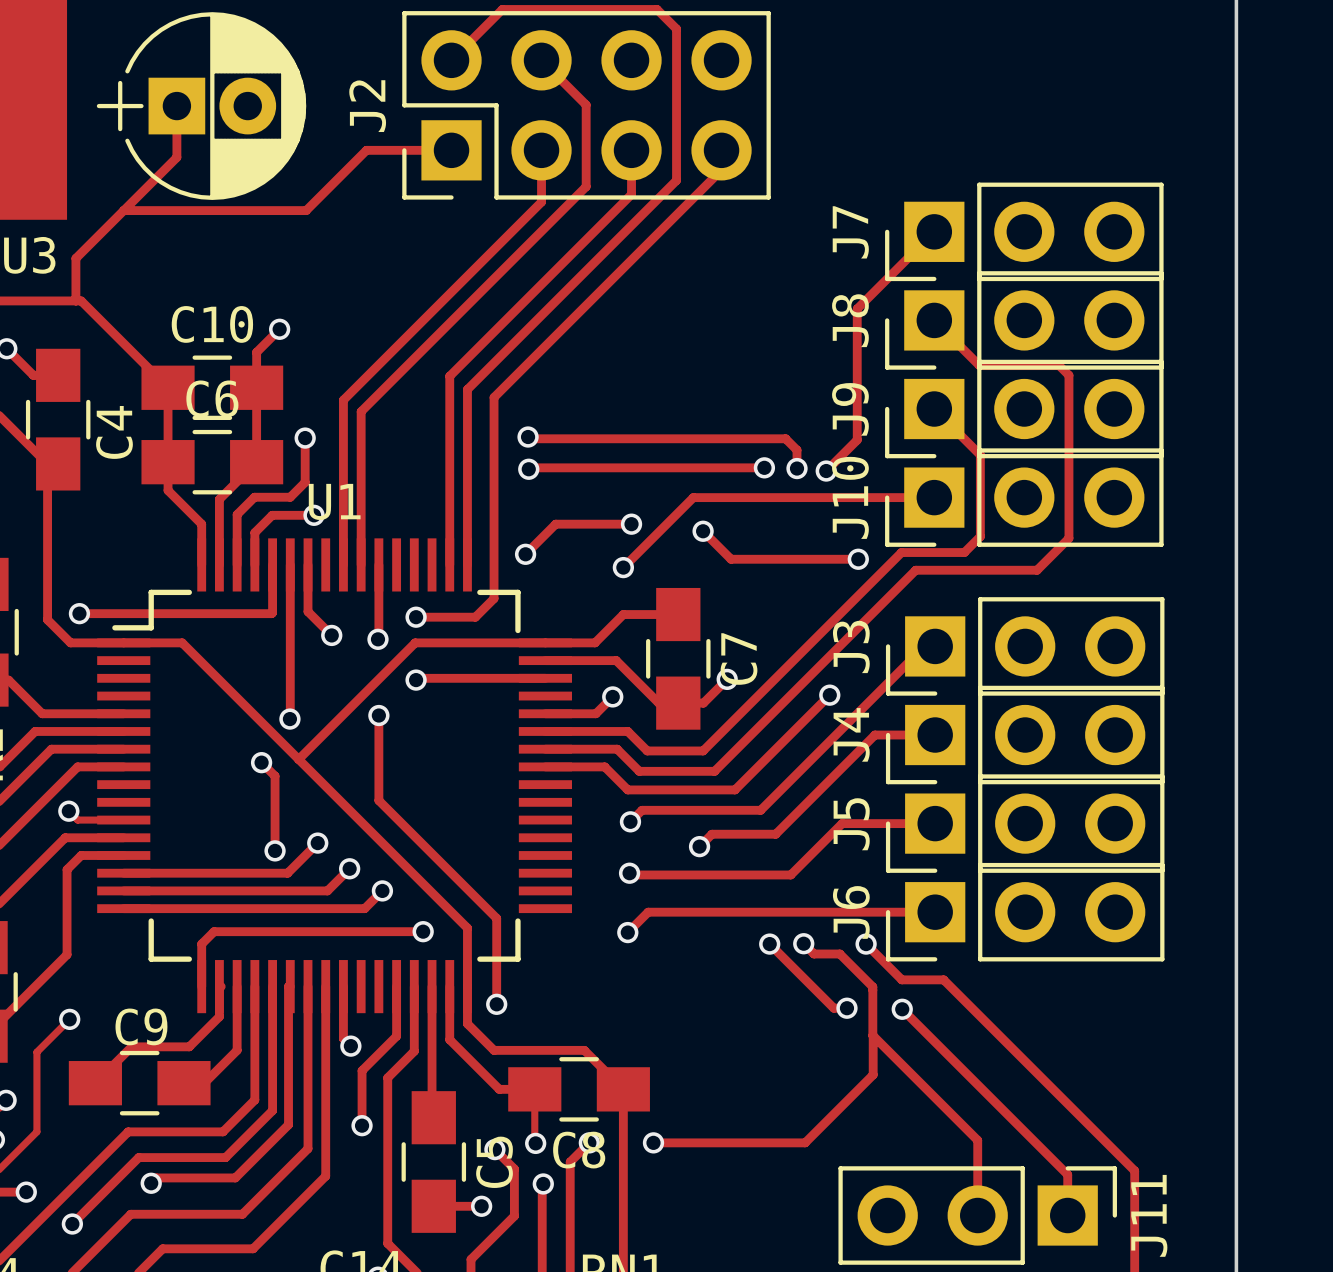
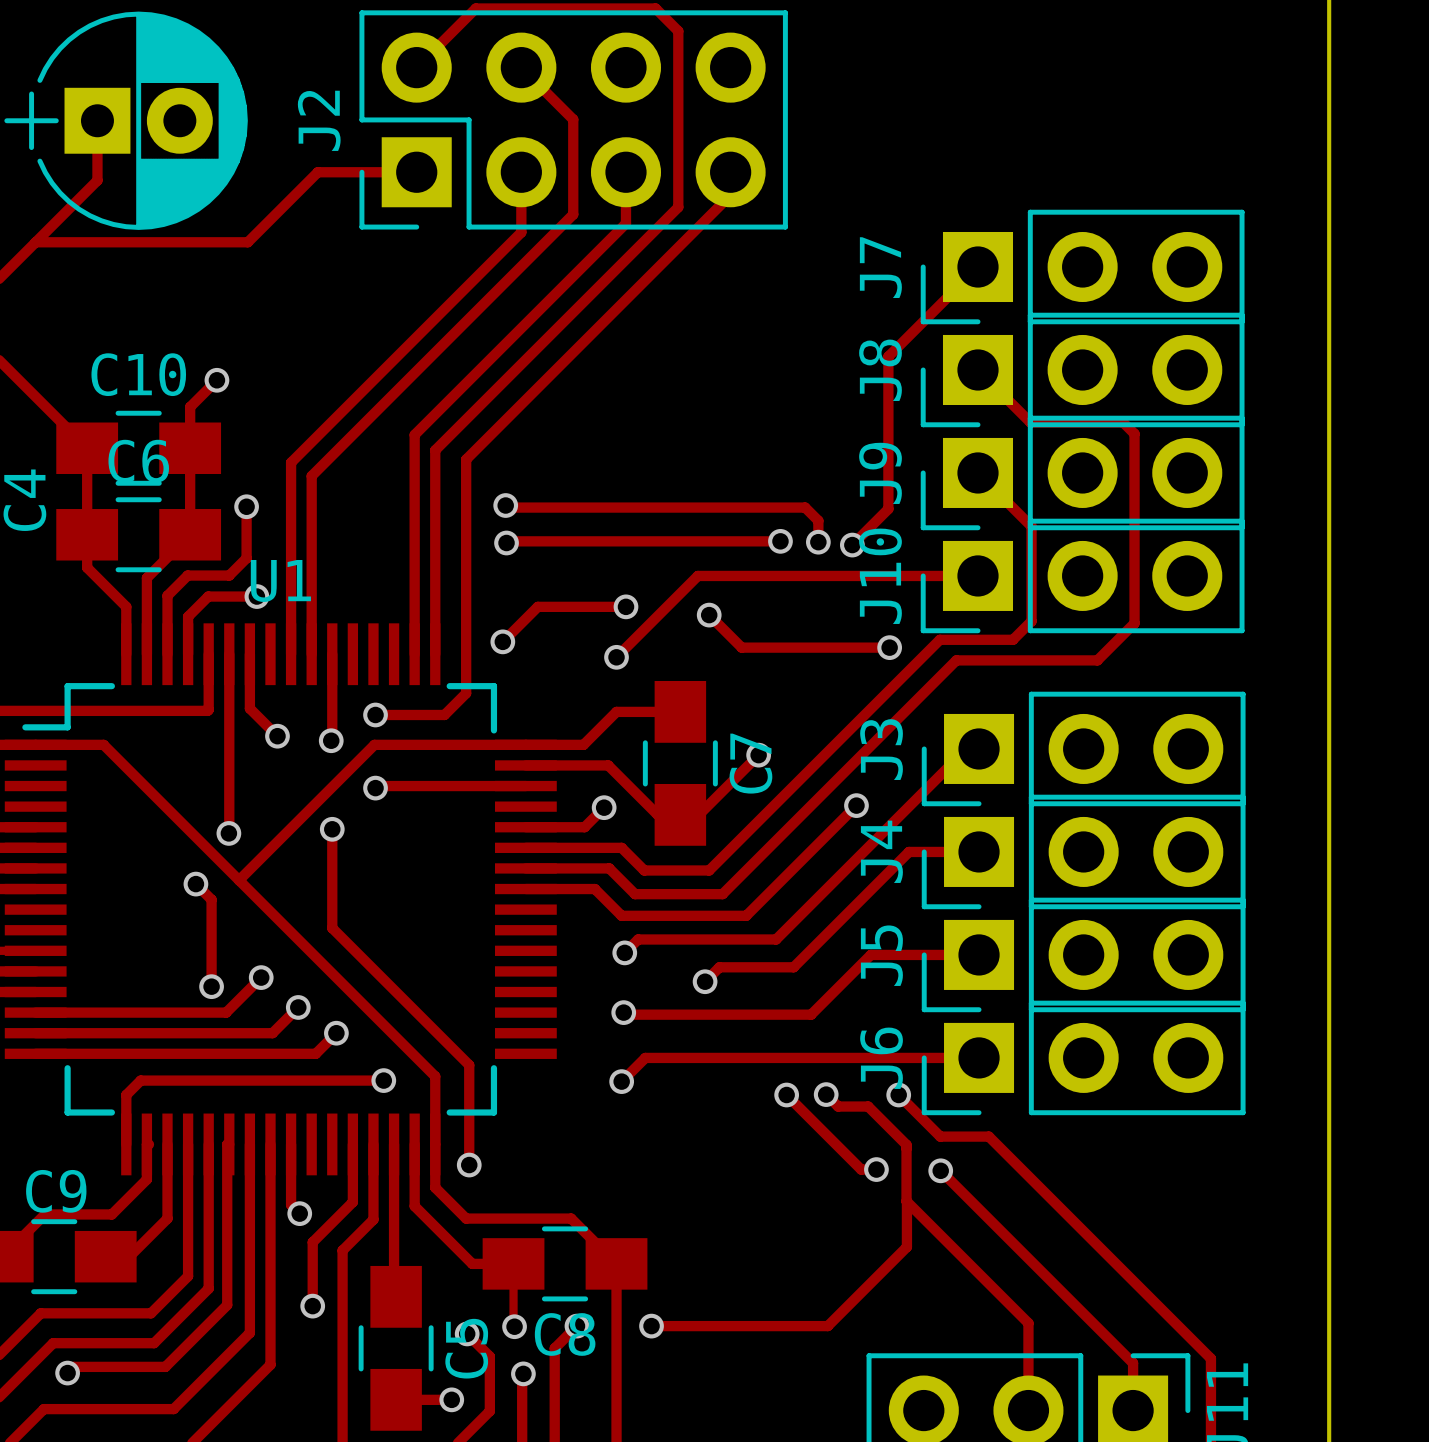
track: (727, 679) (703, 703) (694, 703) -> (758, 755) (698, 814)
via position: (727, 679) -> (758, 755)

